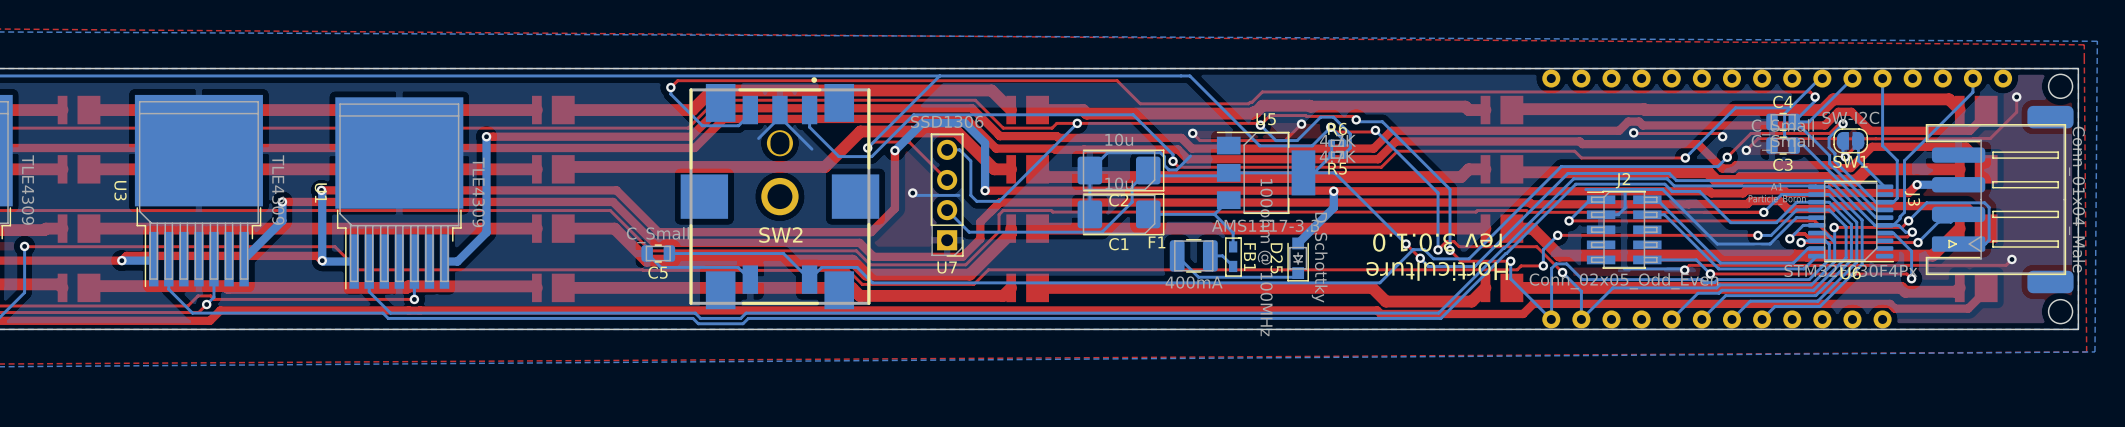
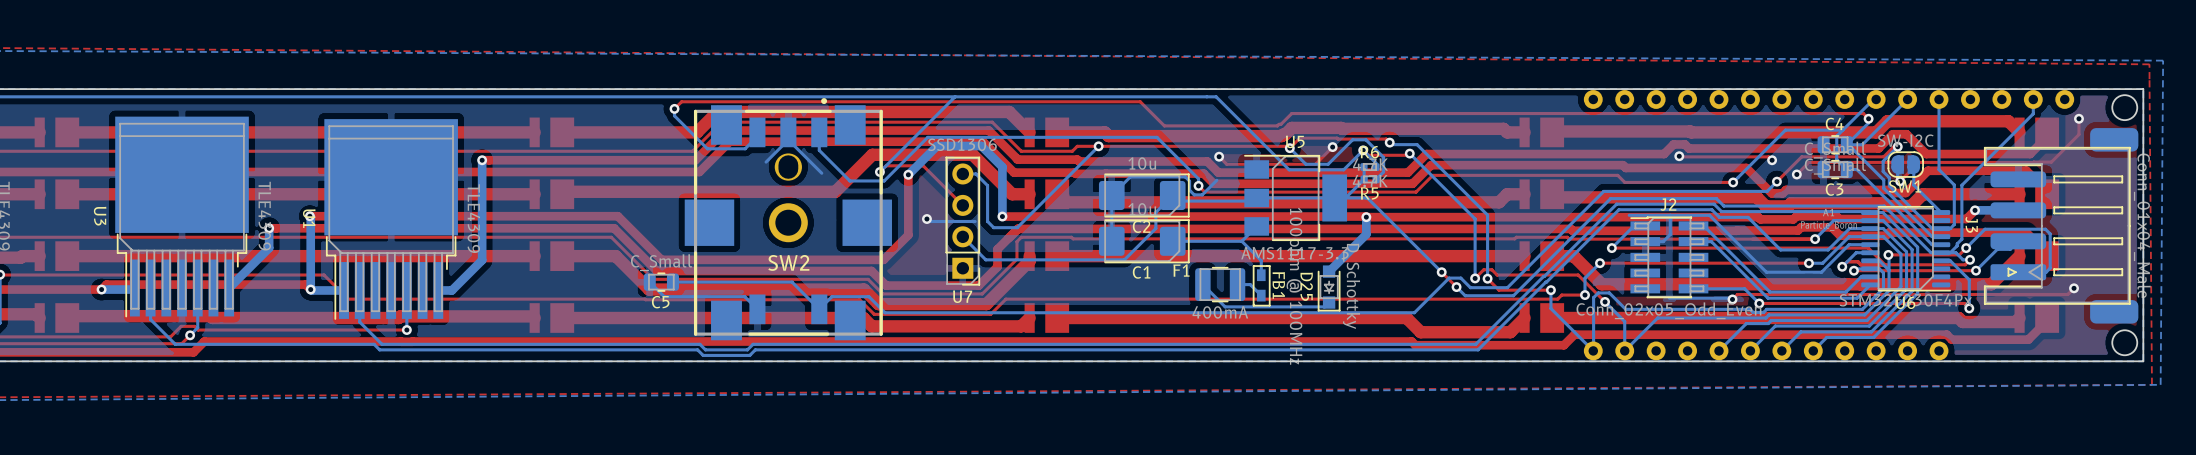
text: rev 3.0.1.0 (1437, 242) -> none
text: Horticulture (1437, 271) -> none

